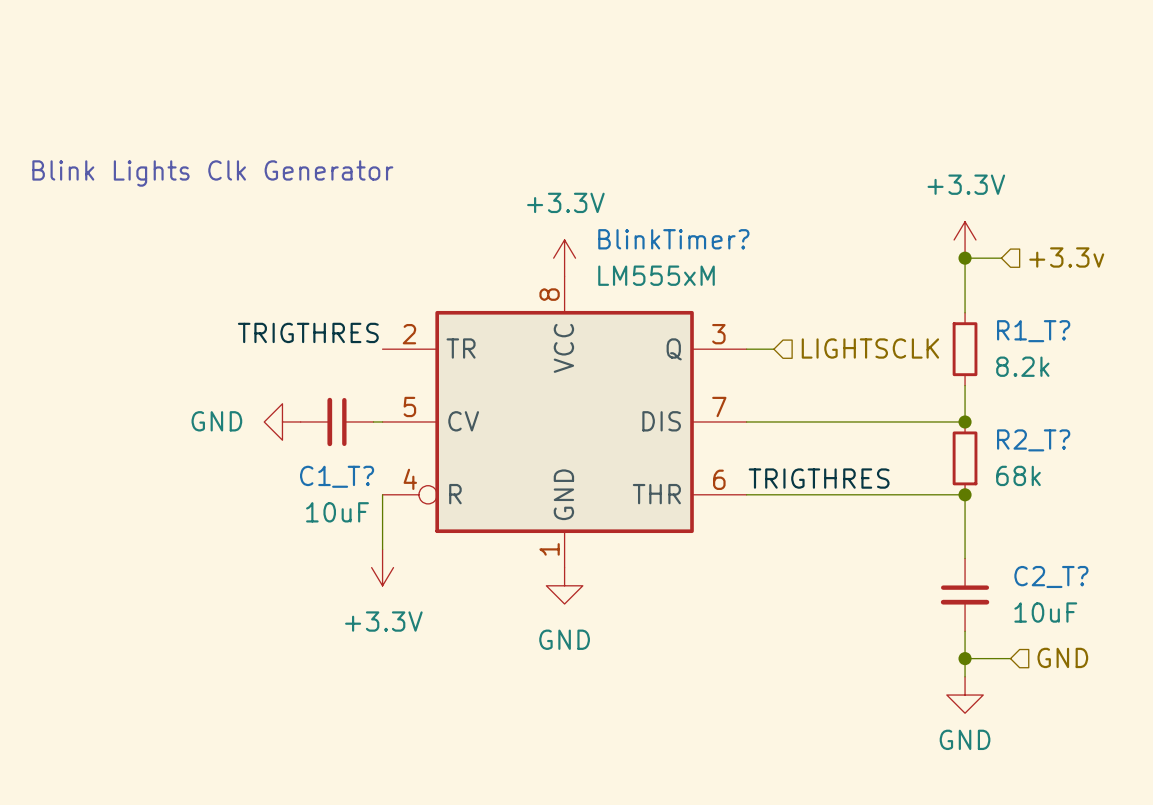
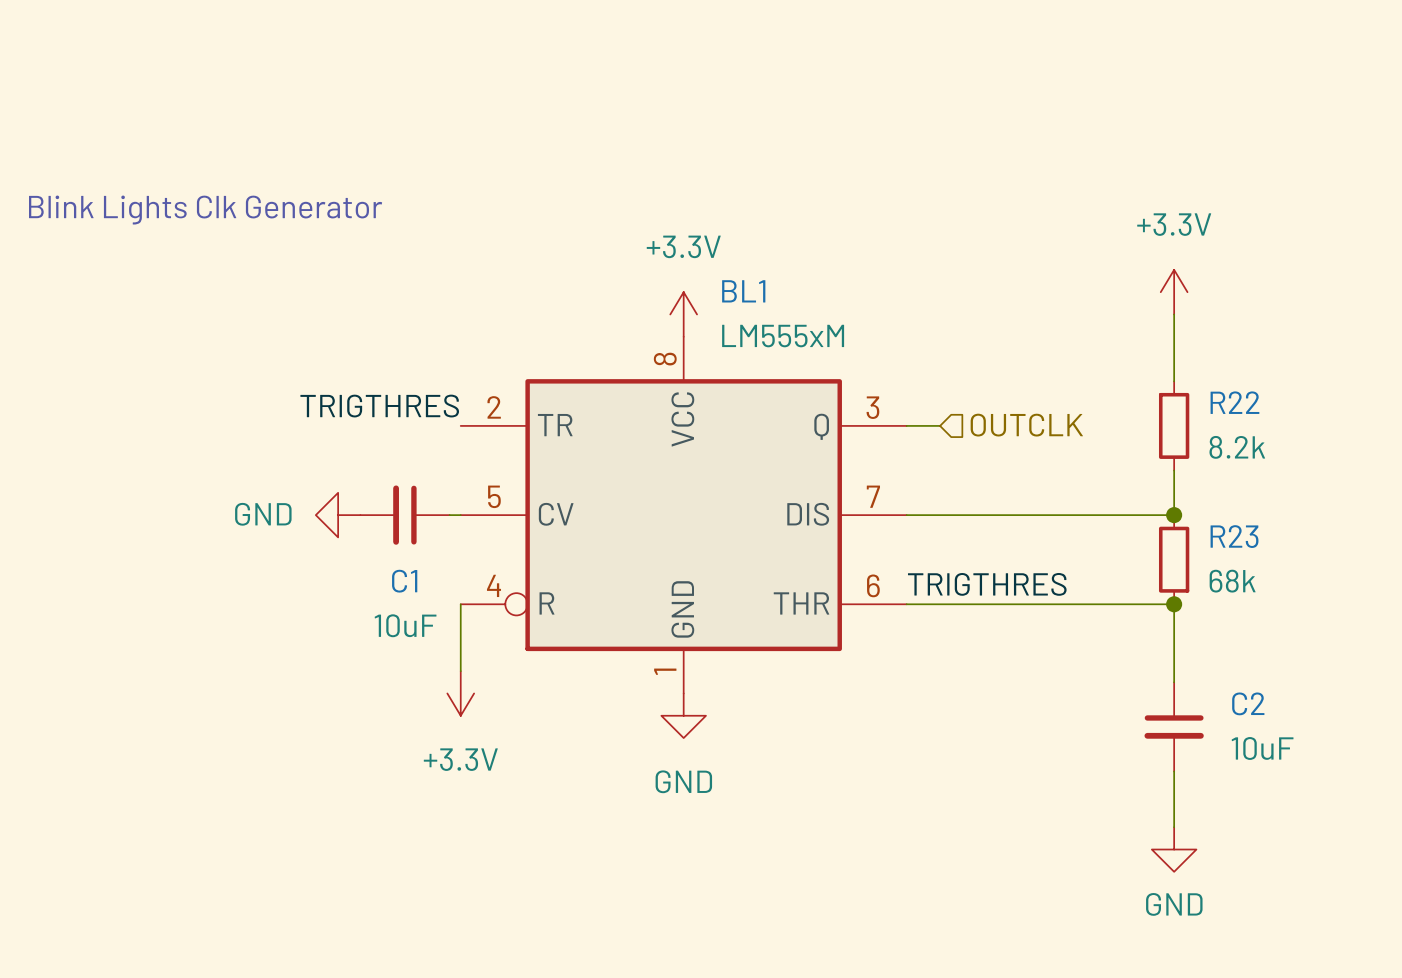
BlinkTimer? name: BlinkTimer? (673, 239) -> BL1 (743, 291)
hierarchical label: +3.3v (1066, 257) -> none
wire: (965, 258) (1001, 258) -> none
junction: (965, 258) -> none
R1_T? name: R1_T? (1033, 331) -> R22 (1234, 402)
hierarchical label: LIGHTSCLK (870, 348) -> OUTCLK (1026, 425)
R2_T? name: R2_T? (1033, 440) -> R23 (1234, 536)
C1_T? name: C1_T? (337, 476) -> C1 (404, 581)
C2_T? name: C2_T? (1051, 576) -> C2 (1248, 703)
hierarchical label: GND (1062, 657) -> none
wire: (965, 658) (1010, 658) -> none
junction: (965, 658) -> none

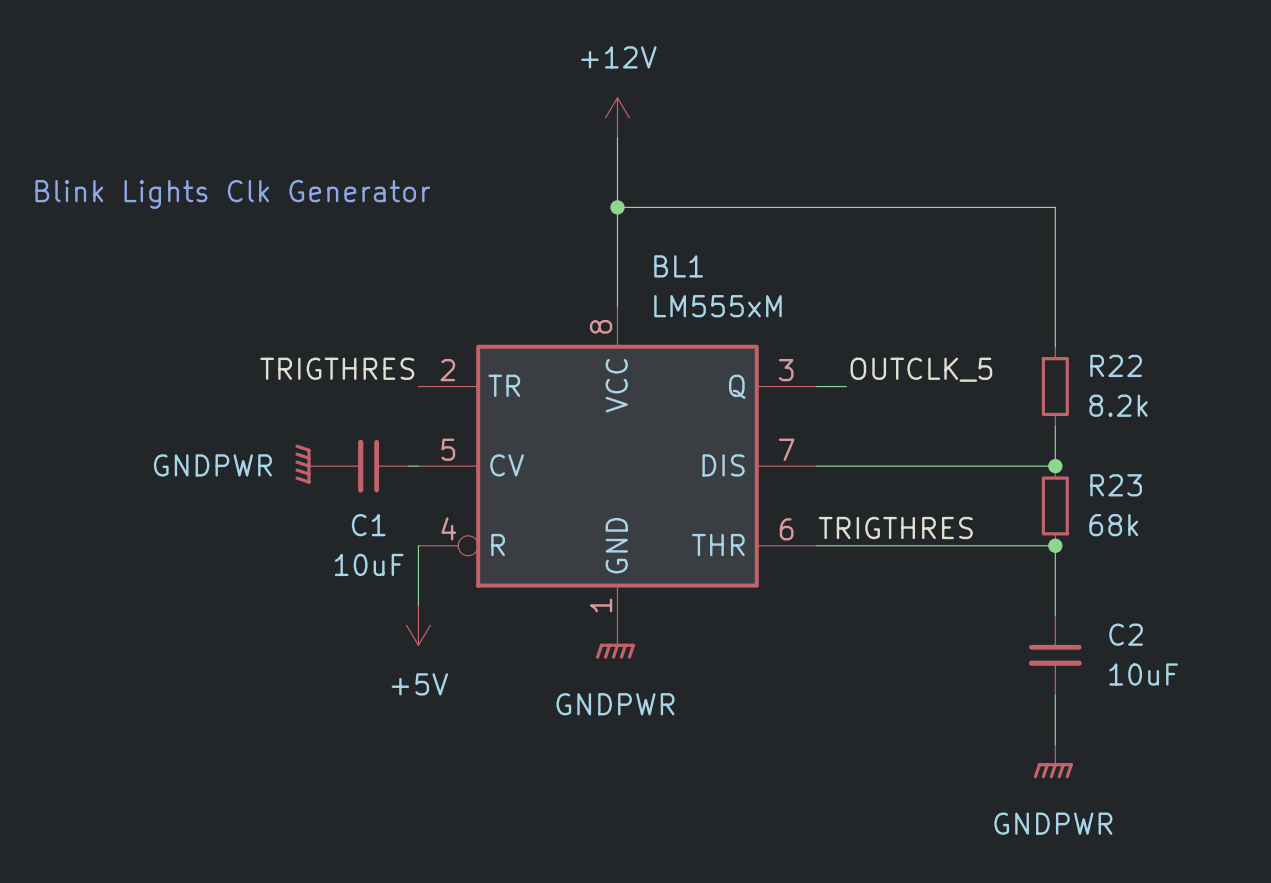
power symbol: none -> +12V (617, 117)
wire: none -> (617, 137) (617, 306)
wire: none -> (617, 207) (1055, 207) (1055, 287)
junction: none -> (617, 207)
power symbol: +3.3V (1174, 292) -> none
power symbol: +3.3V (683, 314) -> none
label: none -> OUTCLK_5 (921, 369)
hierarchical label: OUTCLK (1026, 425) -> none
power symbol: GND (338, 515) -> GNDPWR (312, 464)
power symbol: +3.3V (460, 693) -> +5V (418, 625)
power symbol: GND (683, 715) -> GNDPWR (615, 642)
power symbol: GND (1174, 849) -> GNDPWR (1053, 761)

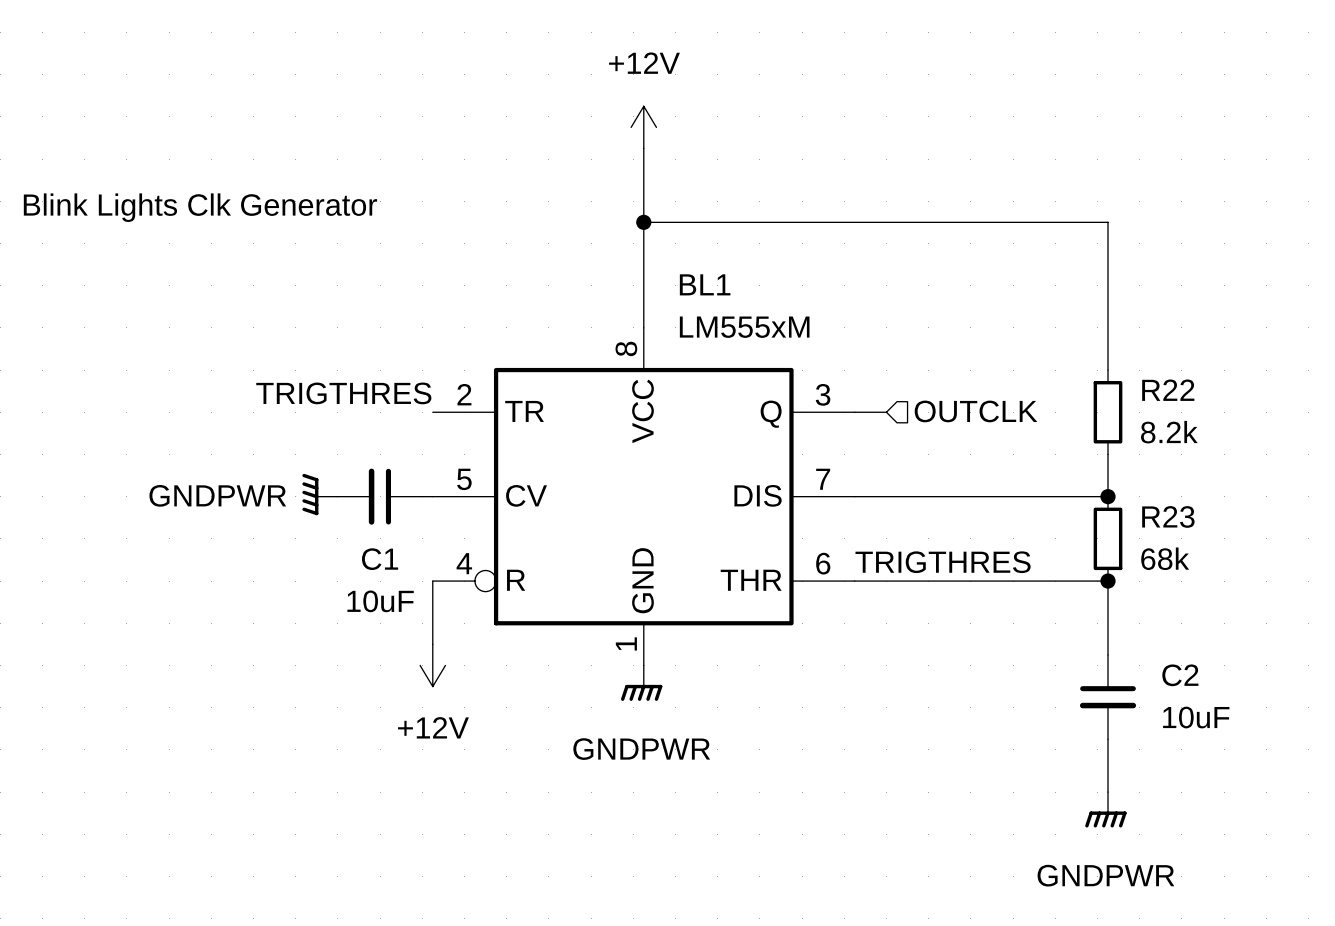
label: OUTCLK_5 (921, 369) -> none
hierarchical label: none -> OUTCLK (976, 411)
power symbol: +5V (418, 625) -> +12V (432, 665)

